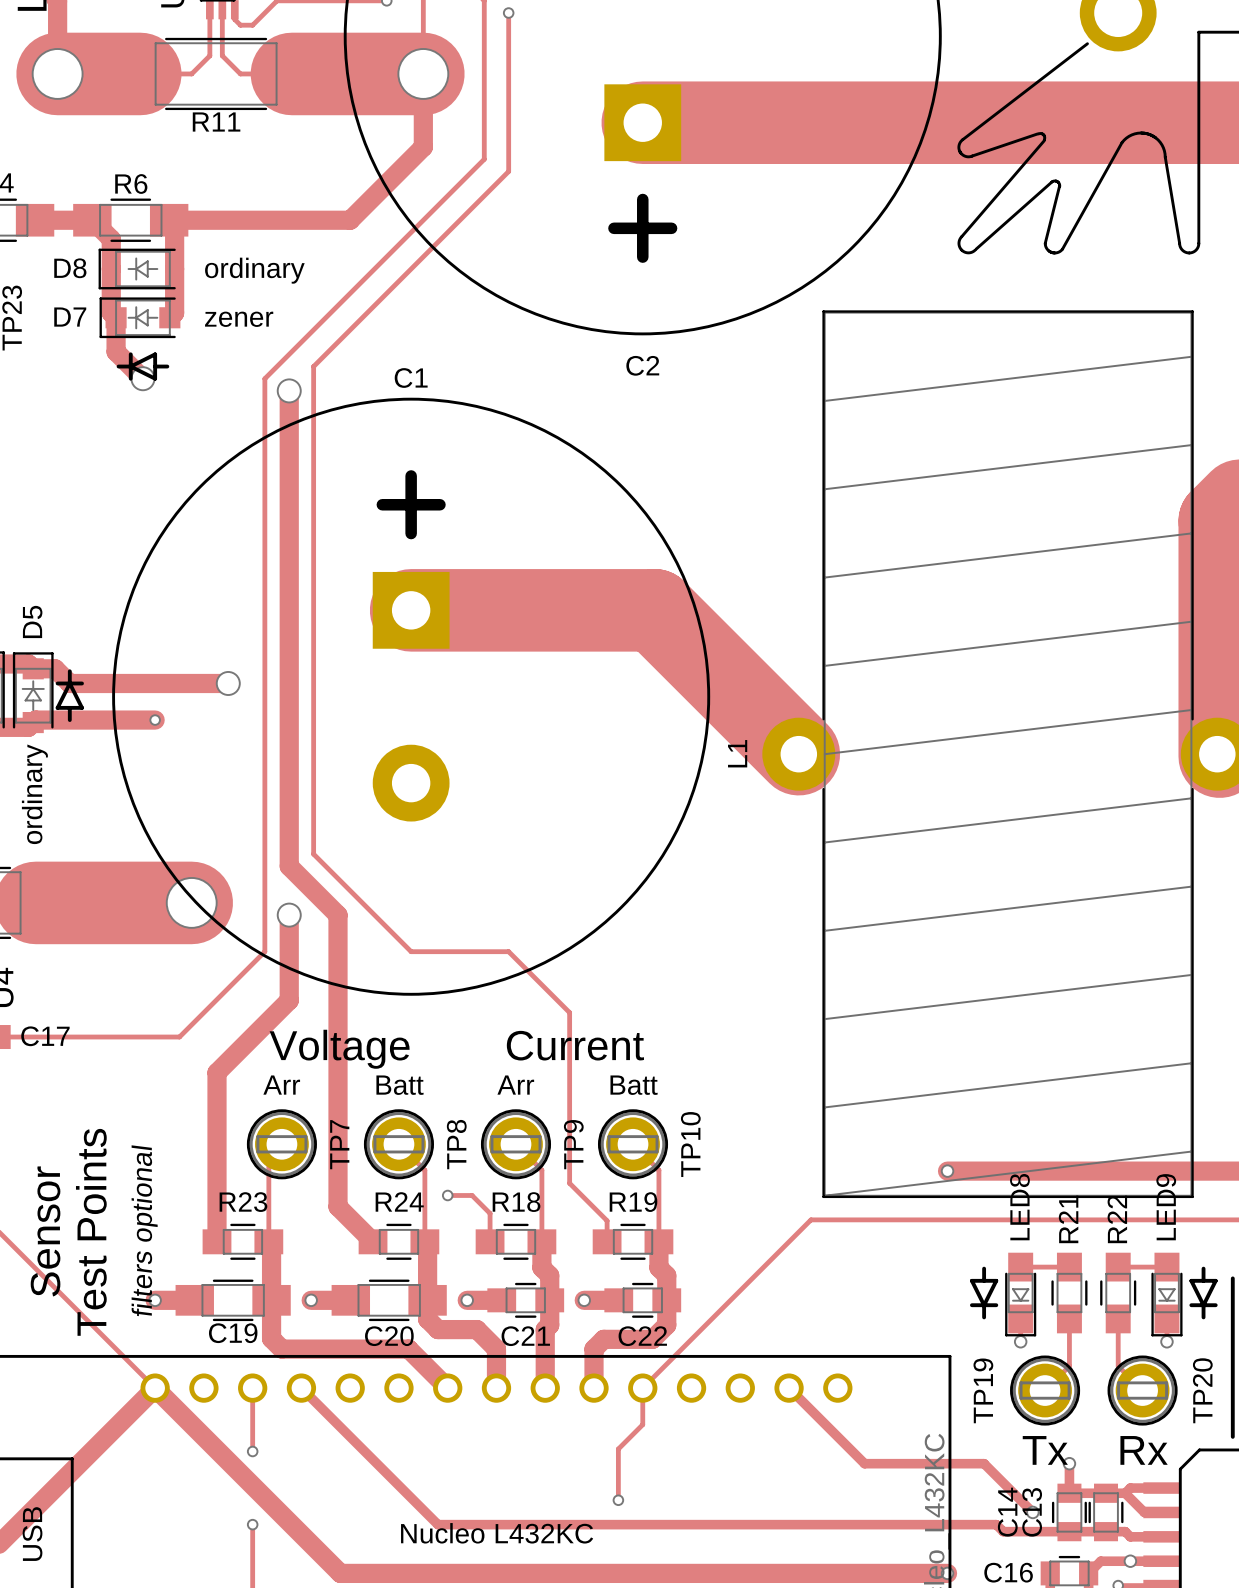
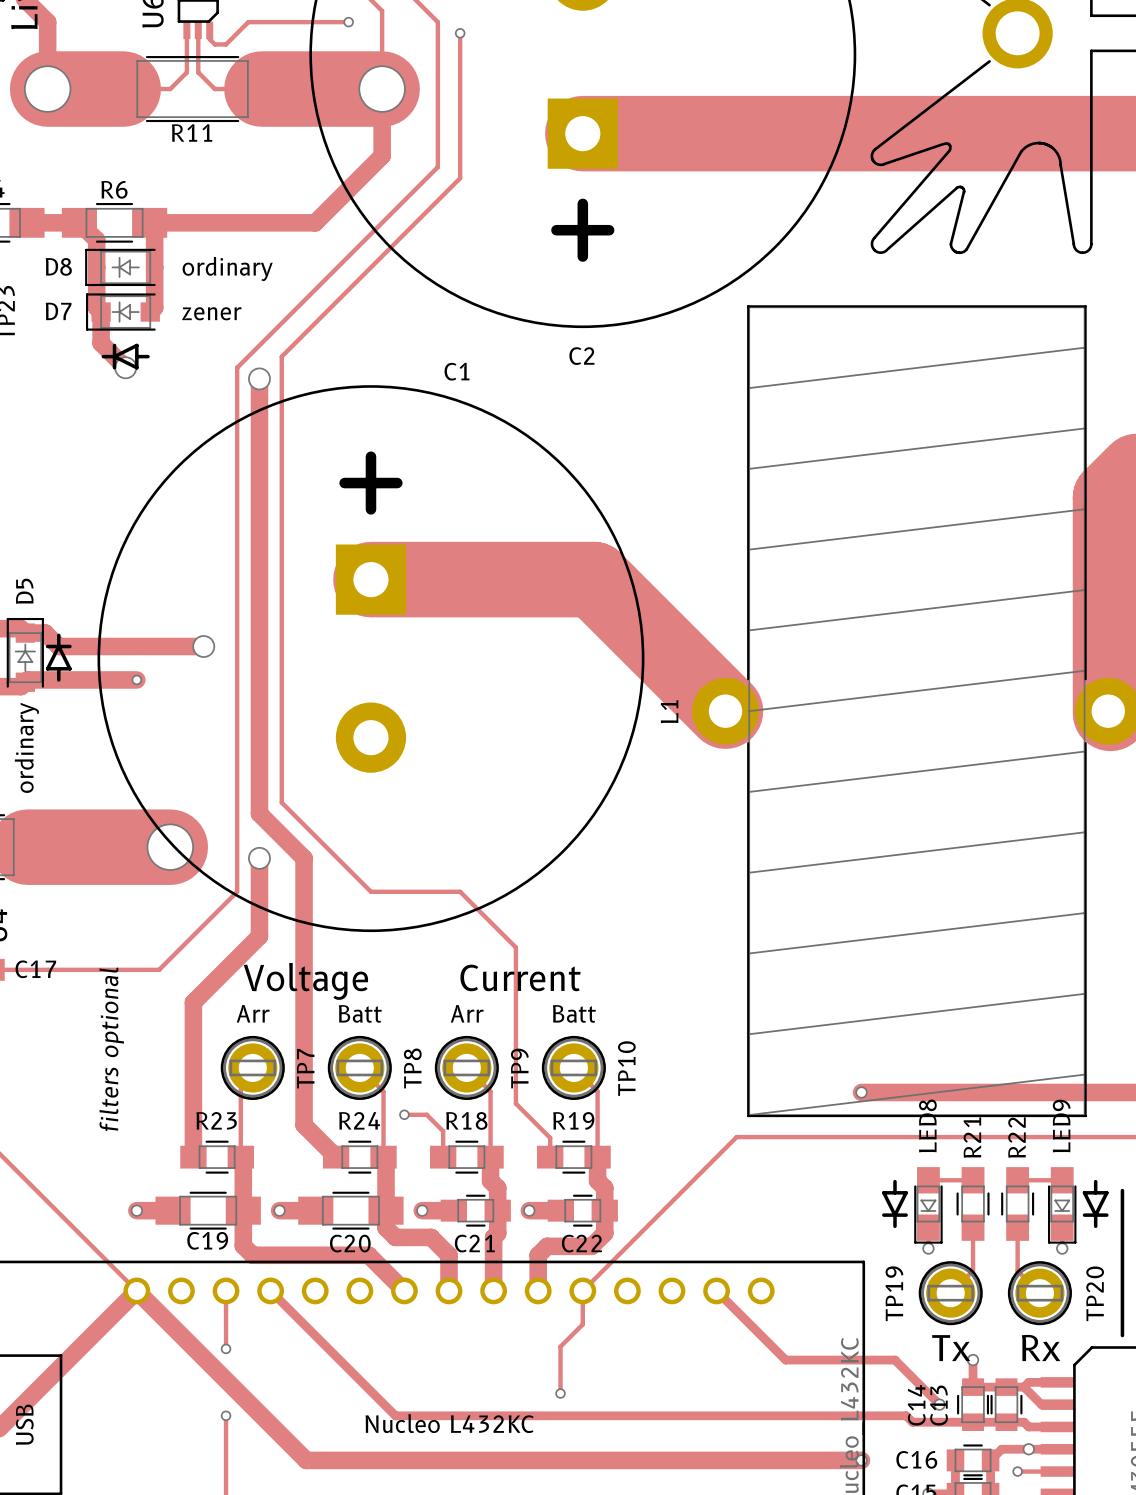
C1 name position: C1 (411, 378) -> C1 (457, 371)
text position: filters optional (144, 1230) -> filters optional (111, 1049)
text: Sensor (45, 1231) -> none
text: Test Points (91, 1232) -> none

